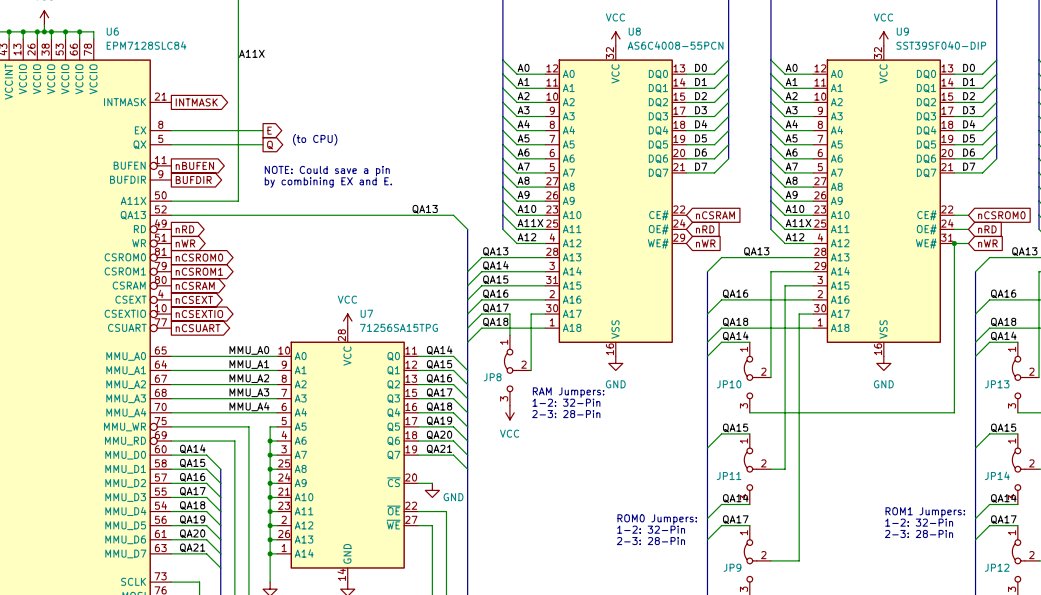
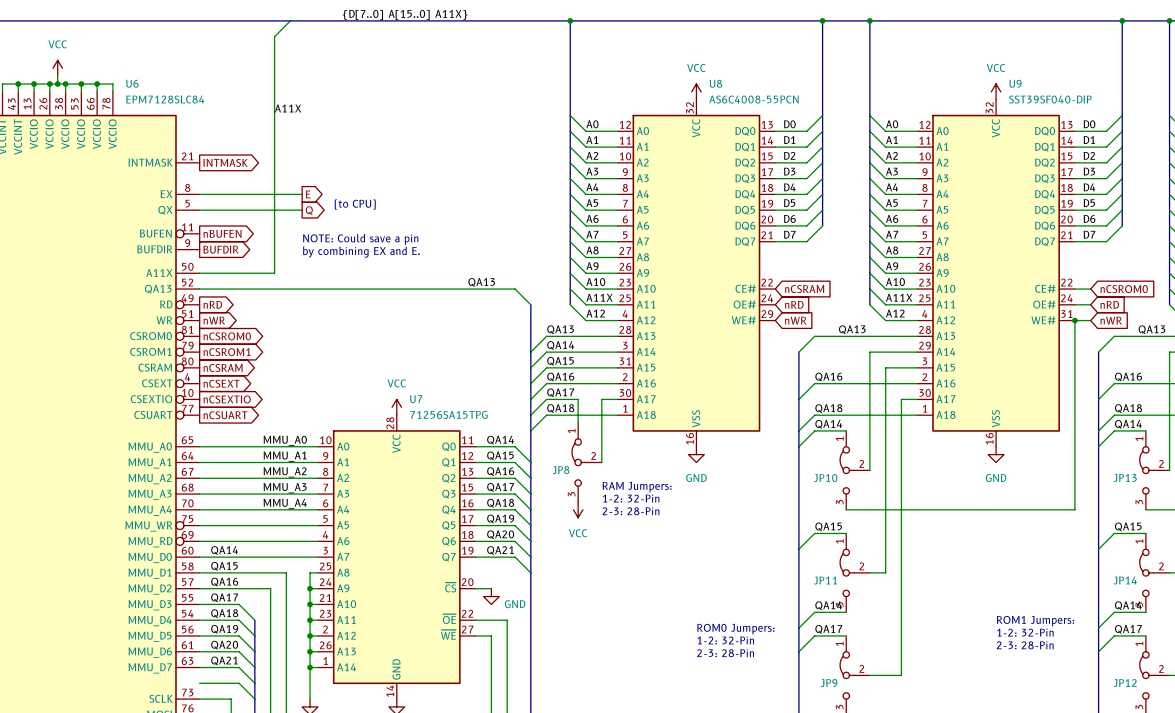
wire: (248, 426) (248, 469) -> (286, 525) (310, 525)
wire: (270, 426) (270, 469) -> none
wire: (234, 441) (234, 483) -> (270, 541) (310, 541)
junction: (270, 441) -> none
wire: (206, 455) (220, 469) -> (239, 557) (310, 557)
junction: (270, 455) -> none
wire: (206, 469) (220, 483) -> (239, 572) (286, 572)
bus: (220, 469) (220, 511) -> none
junction: (270, 469) -> none
wire: (206, 483) (220, 497) -> (239, 588) (270, 588)
wire: none -> (199, 683) (239, 683) (254, 699)

